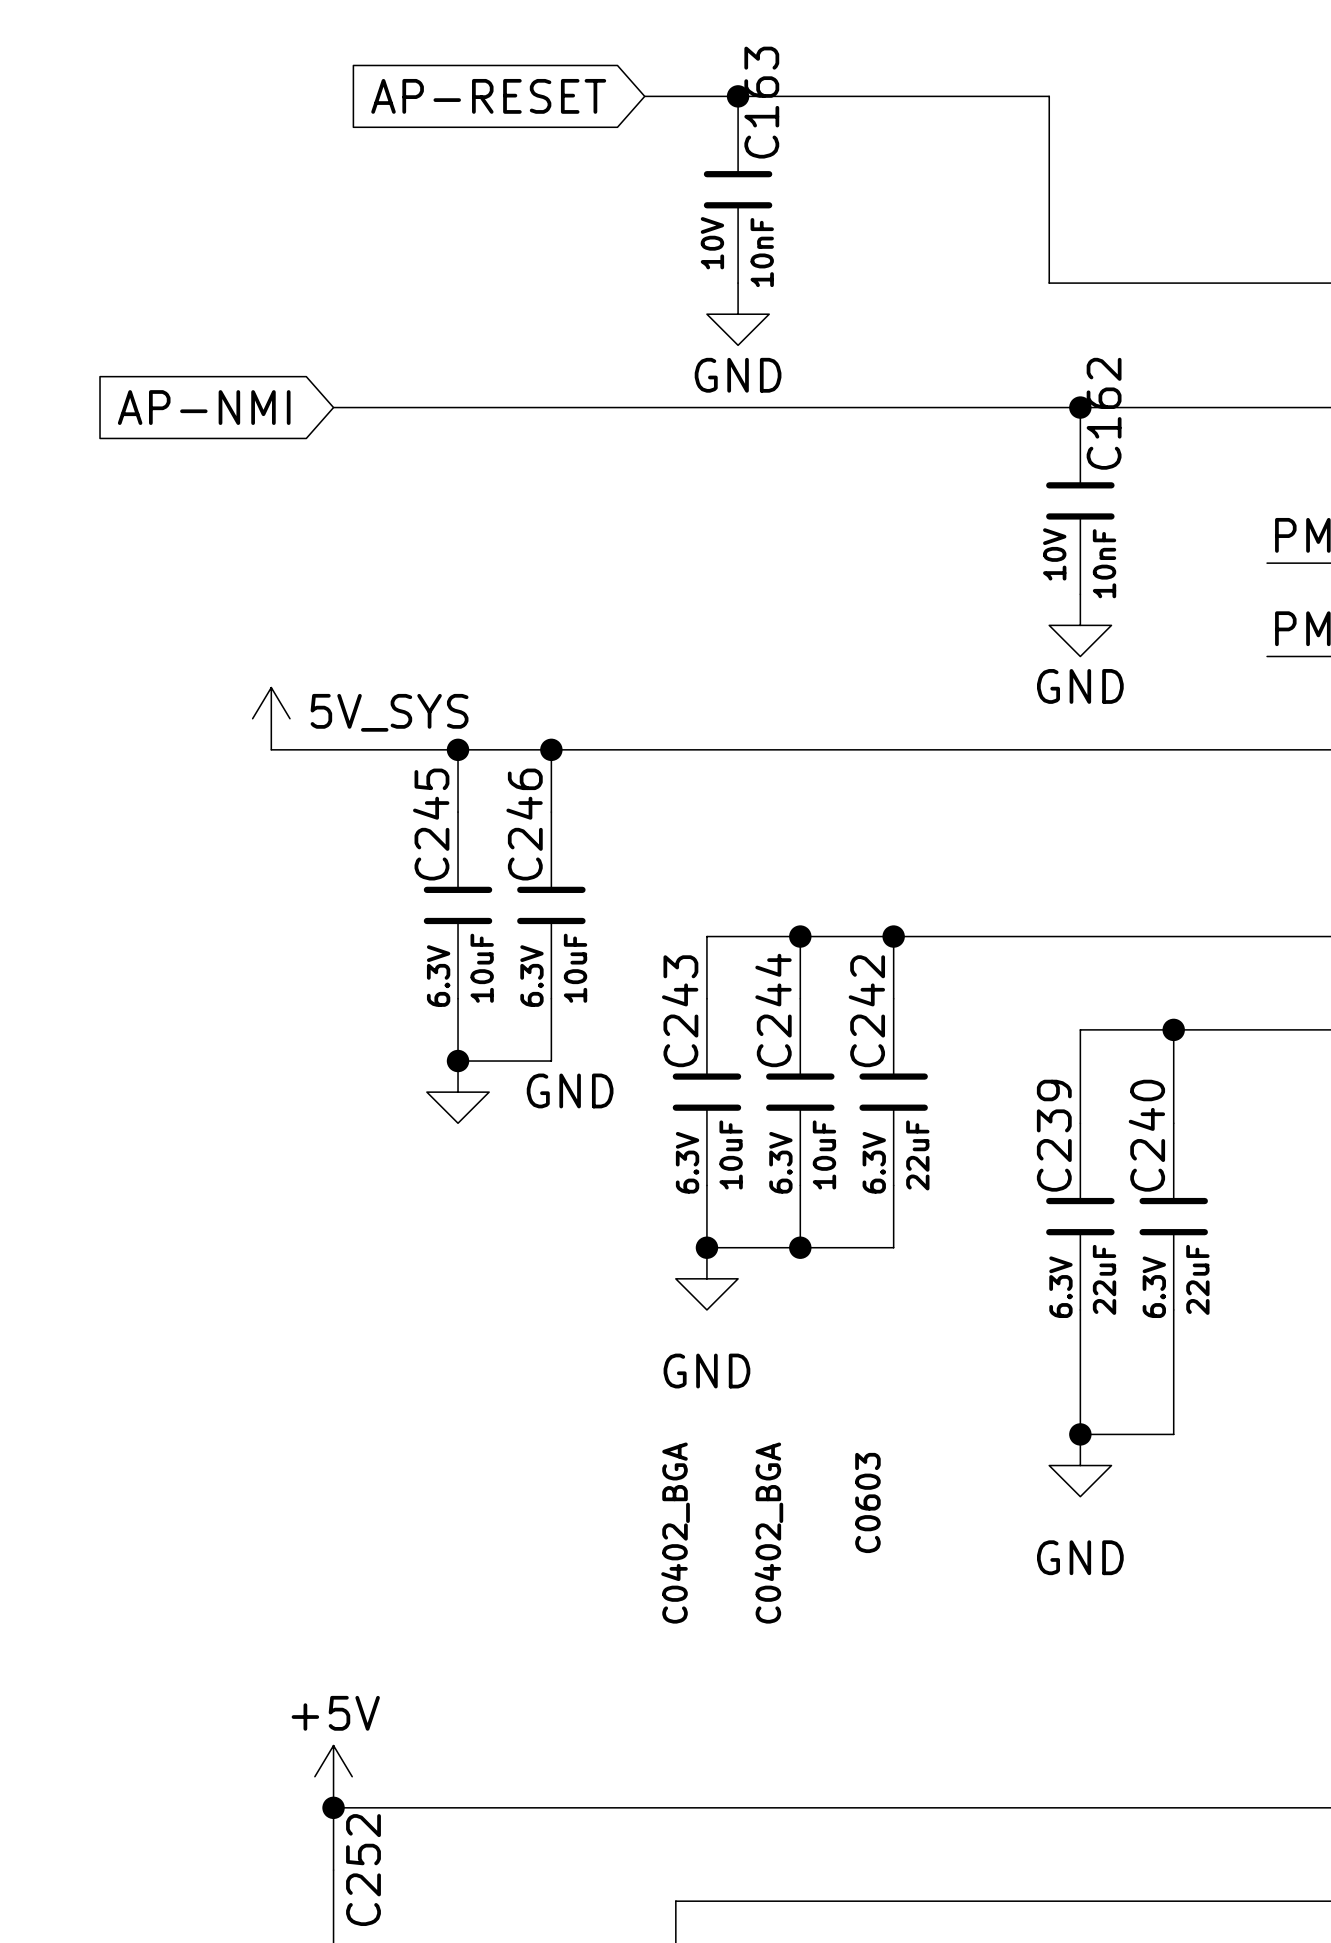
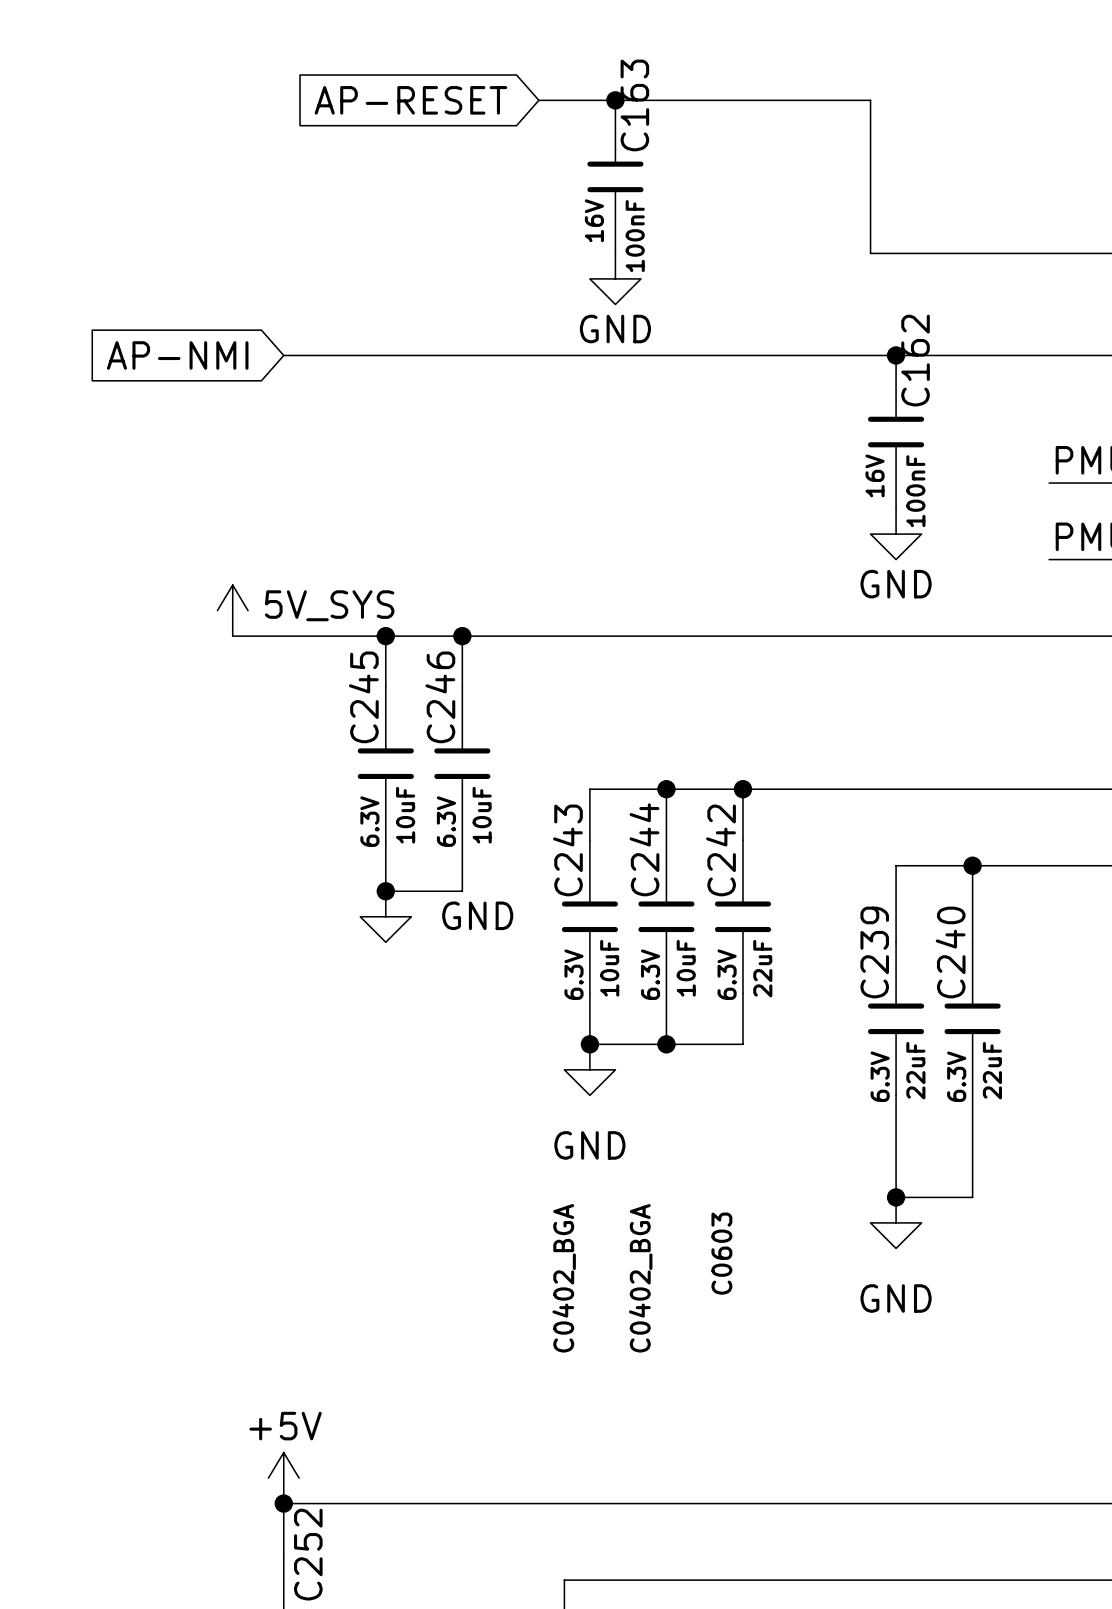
C163 text: 10V (712, 243) -> 16V (594, 220)
C163 value: 10nF (762, 252) -> 100nF (635, 236)
C162 text: 10V (1054, 554) -> 16V (875, 475)
C162 value: 10nF (1104, 563) -> 100nF (915, 491)

